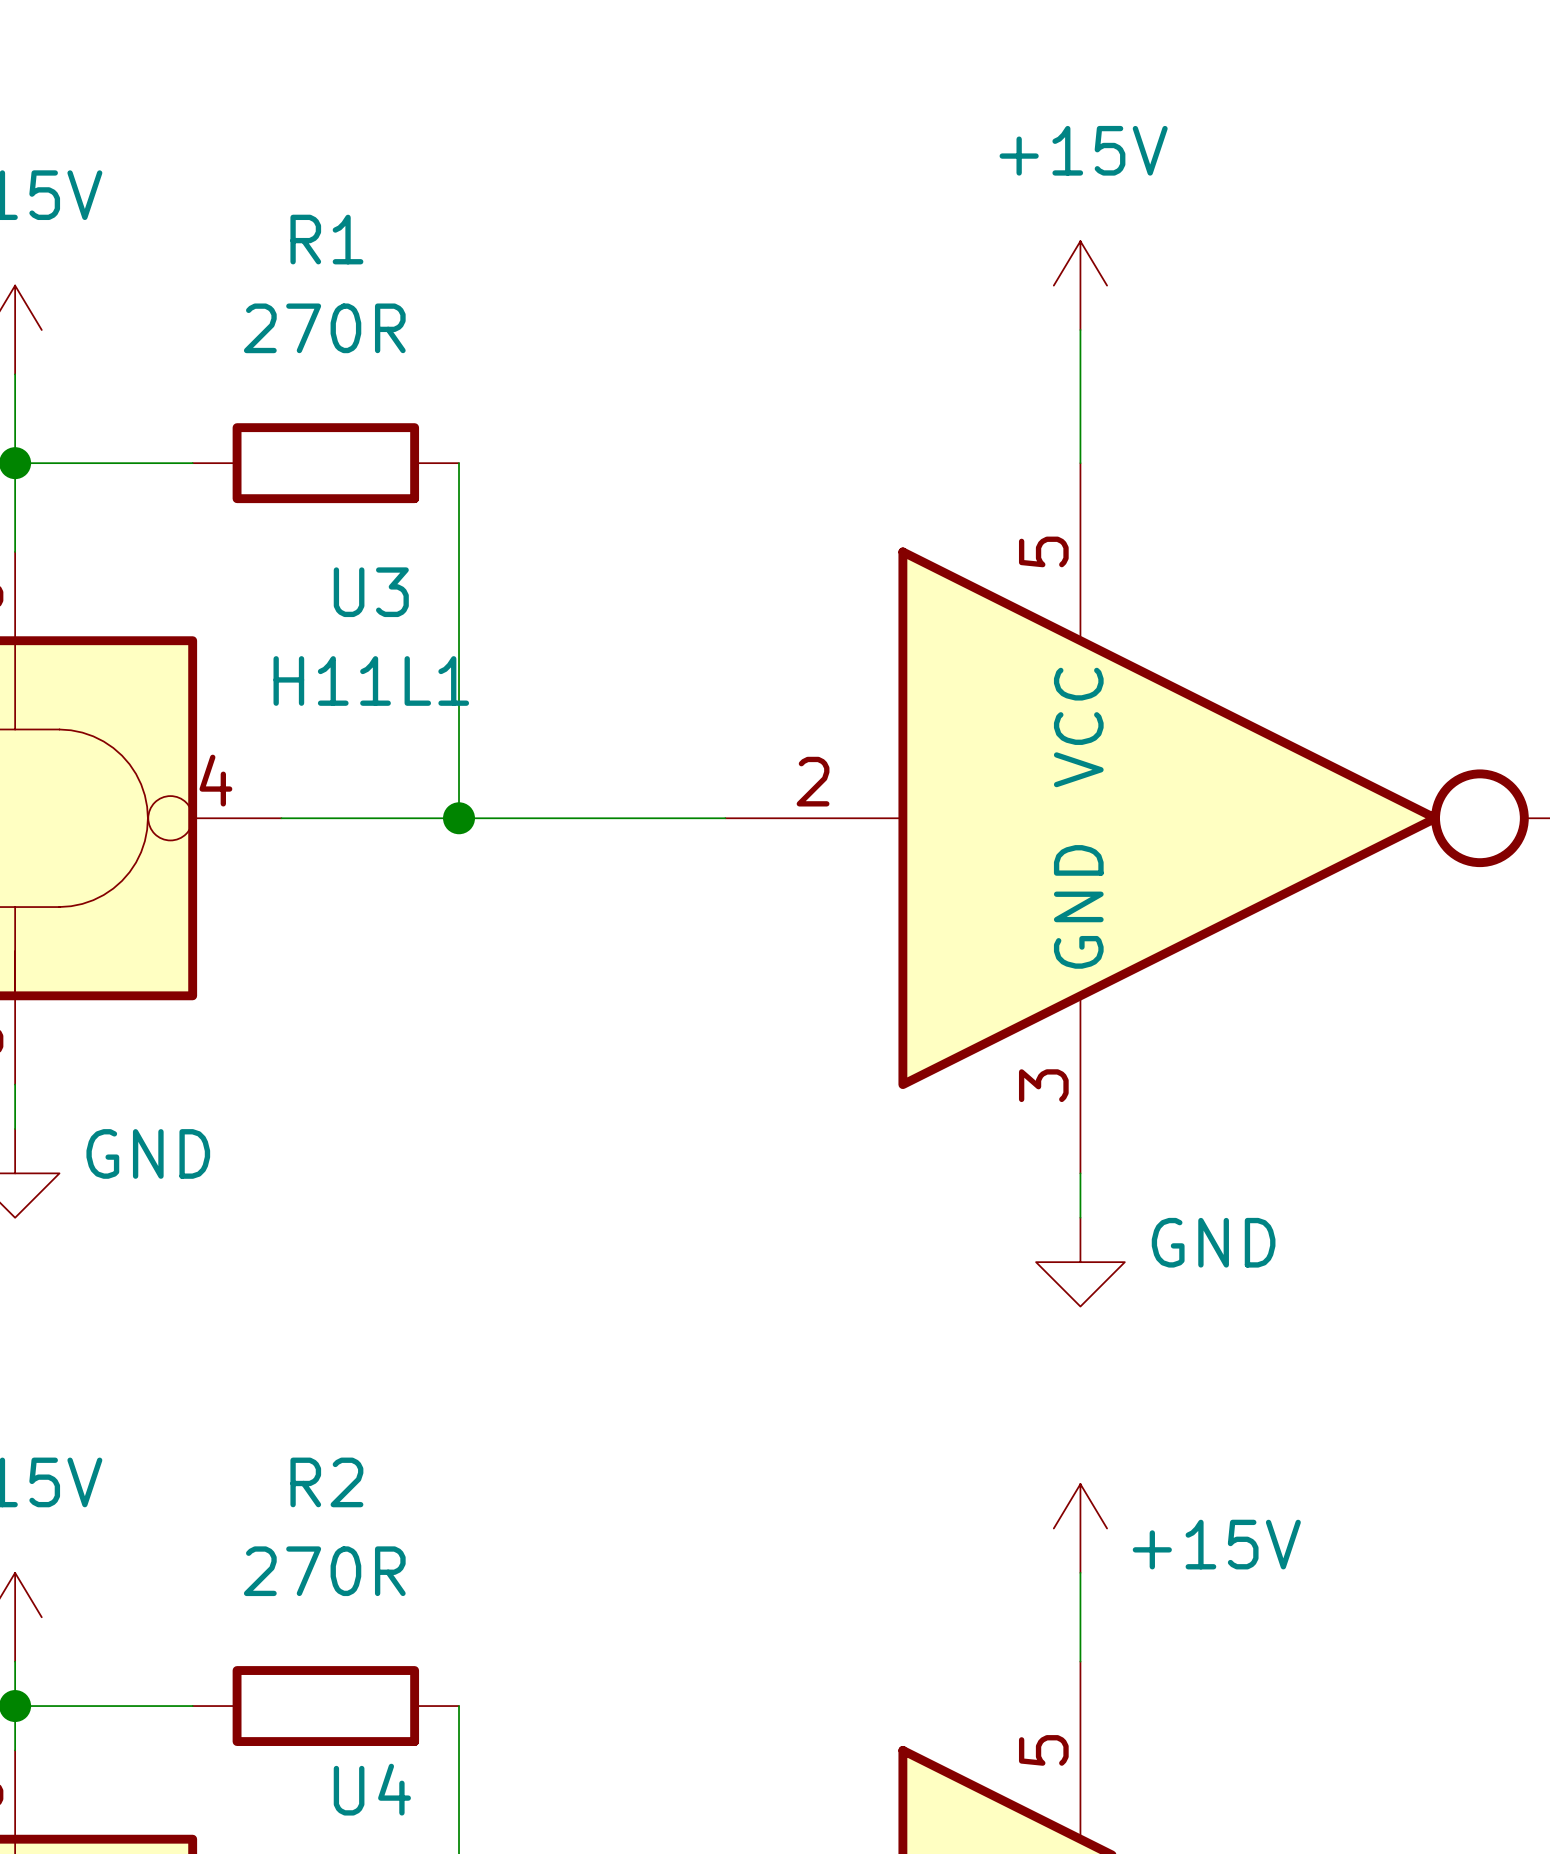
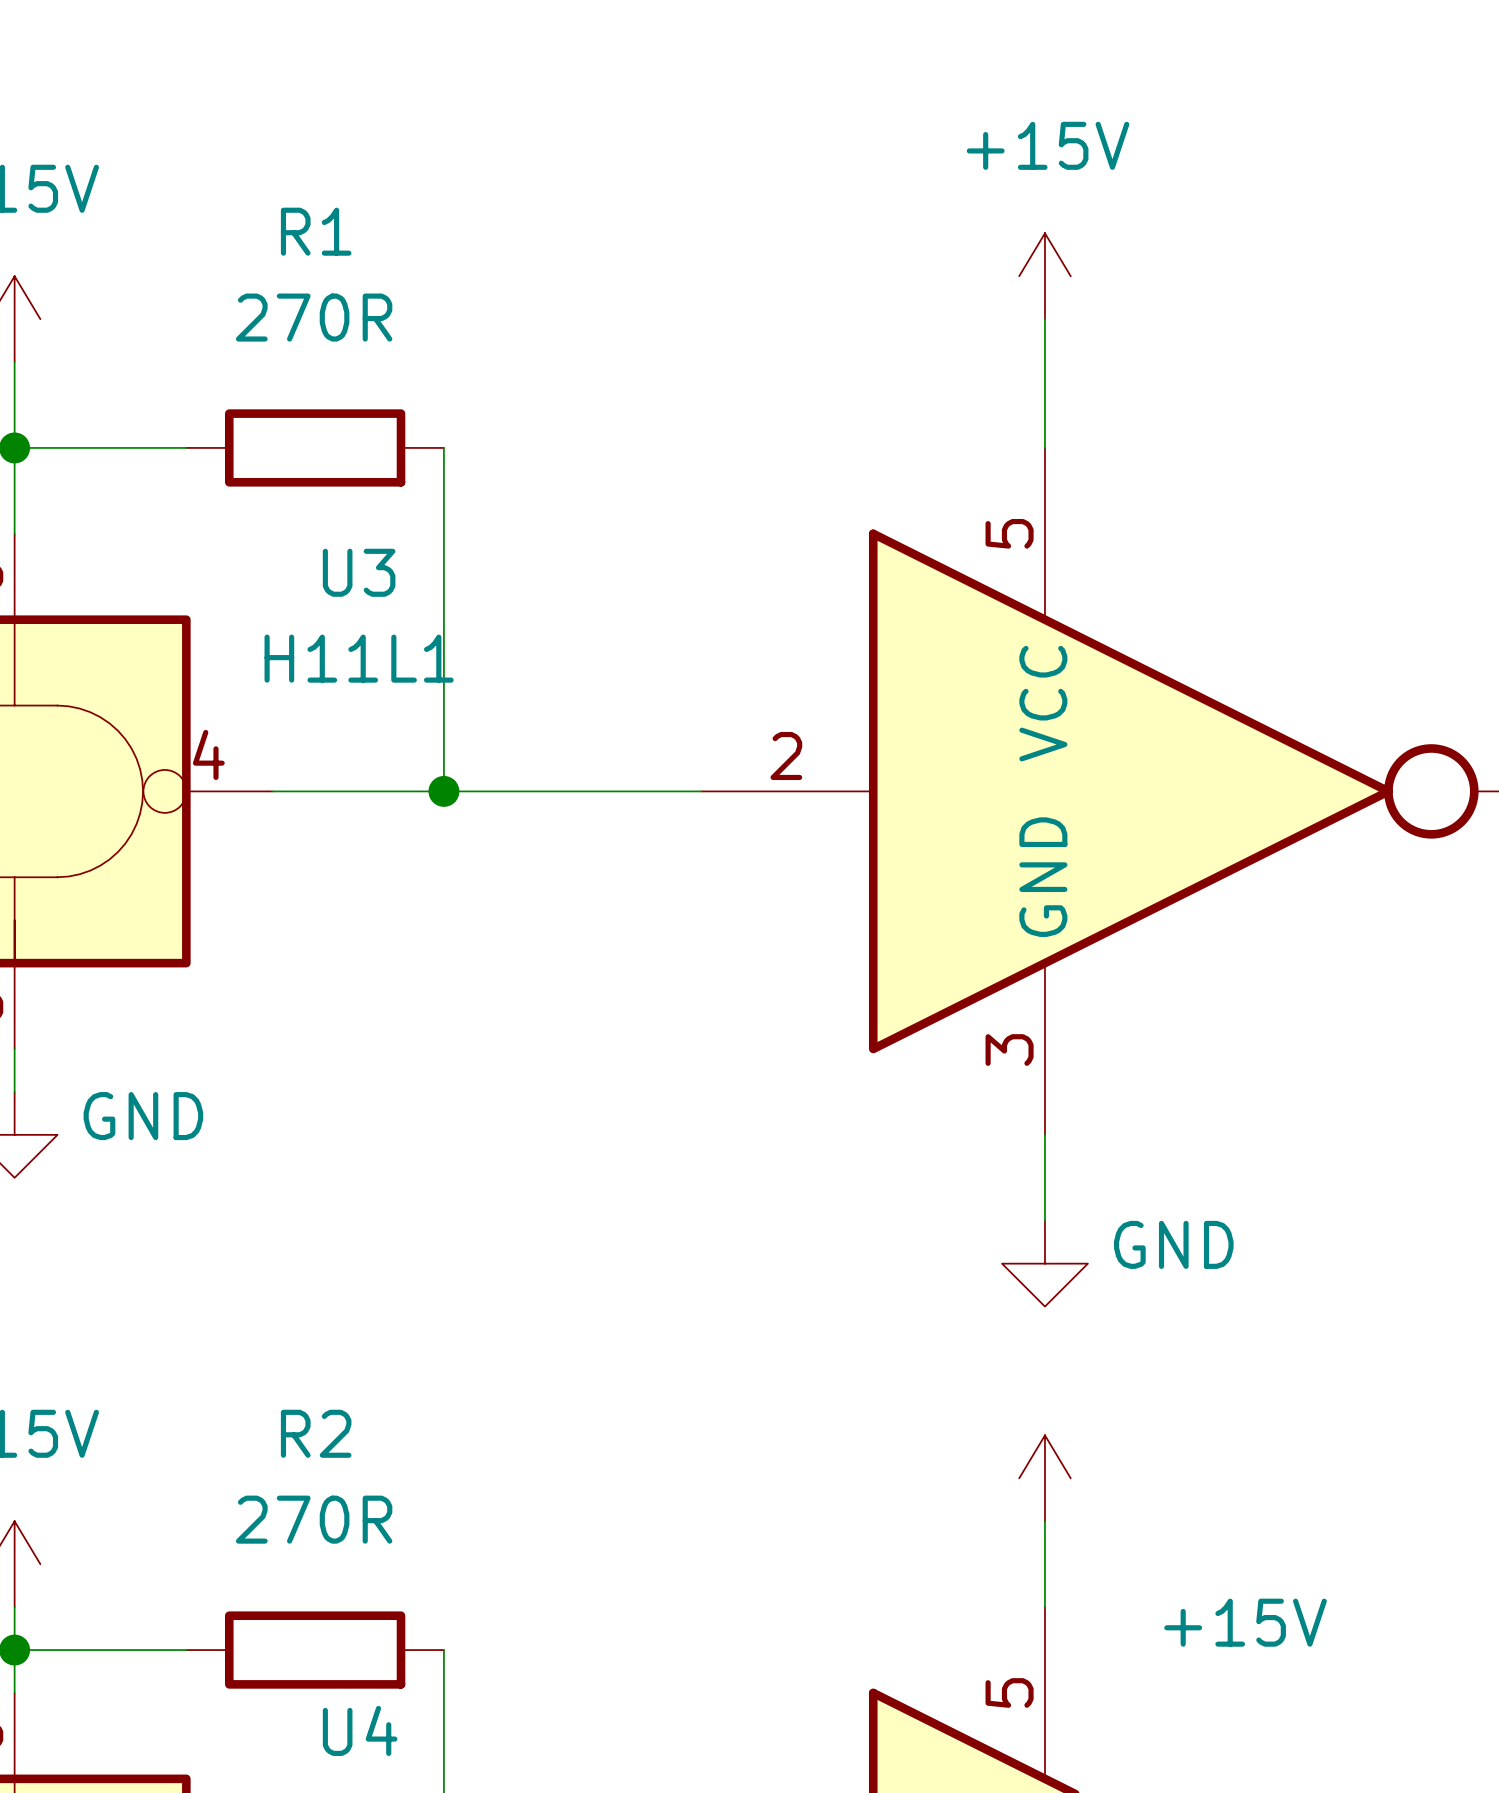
power symbol position: GND (1080, 1262) -> GND (1044, 1263)
power symbol text position: +15V (1216, 1544) -> +15V (1245, 1622)

